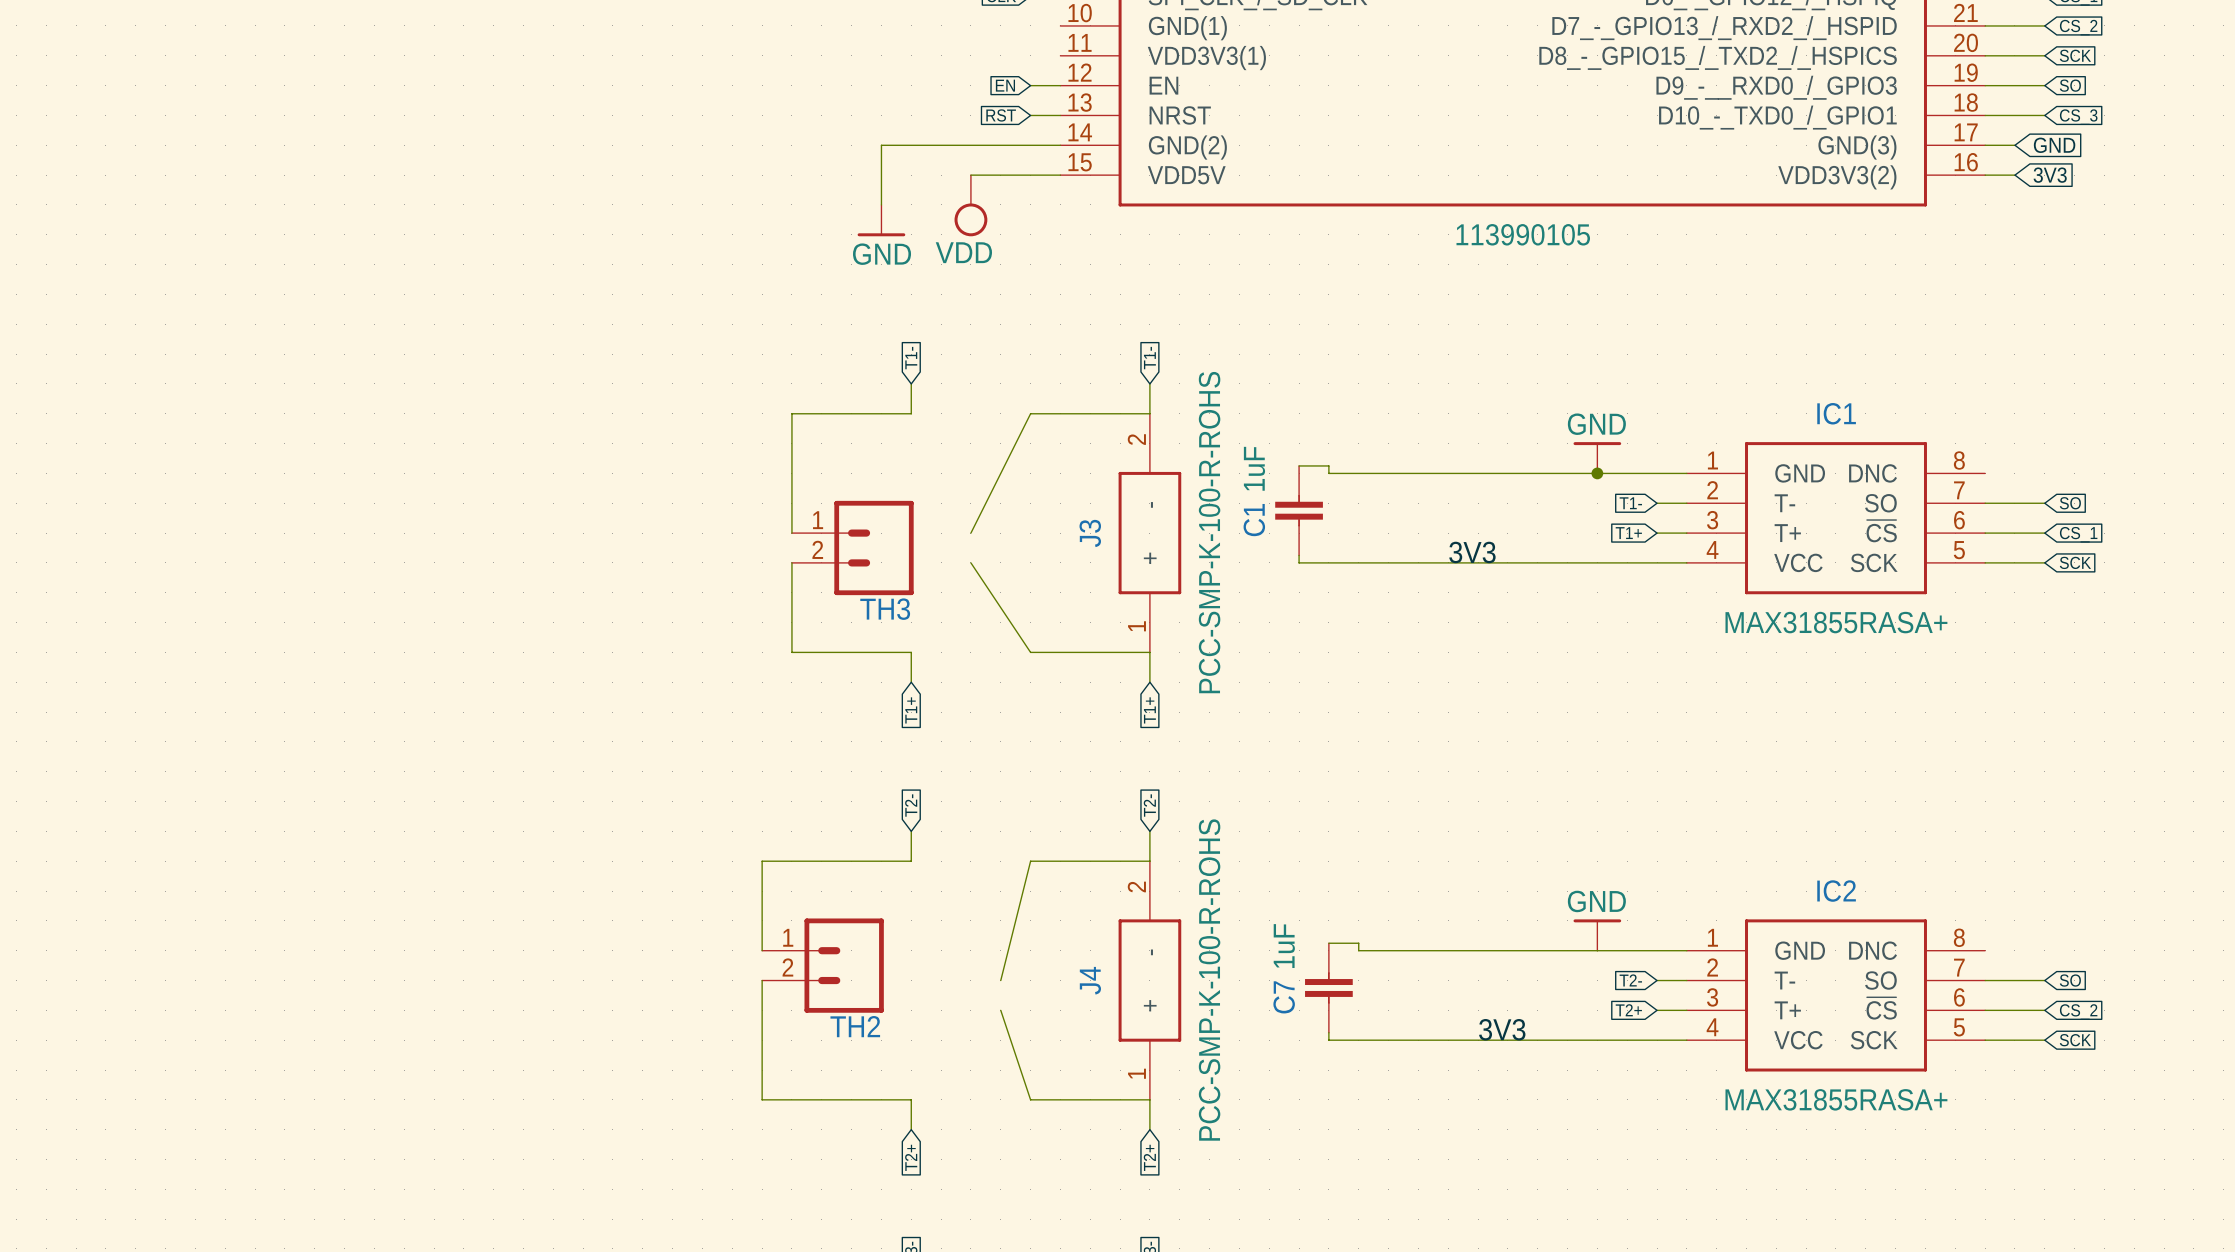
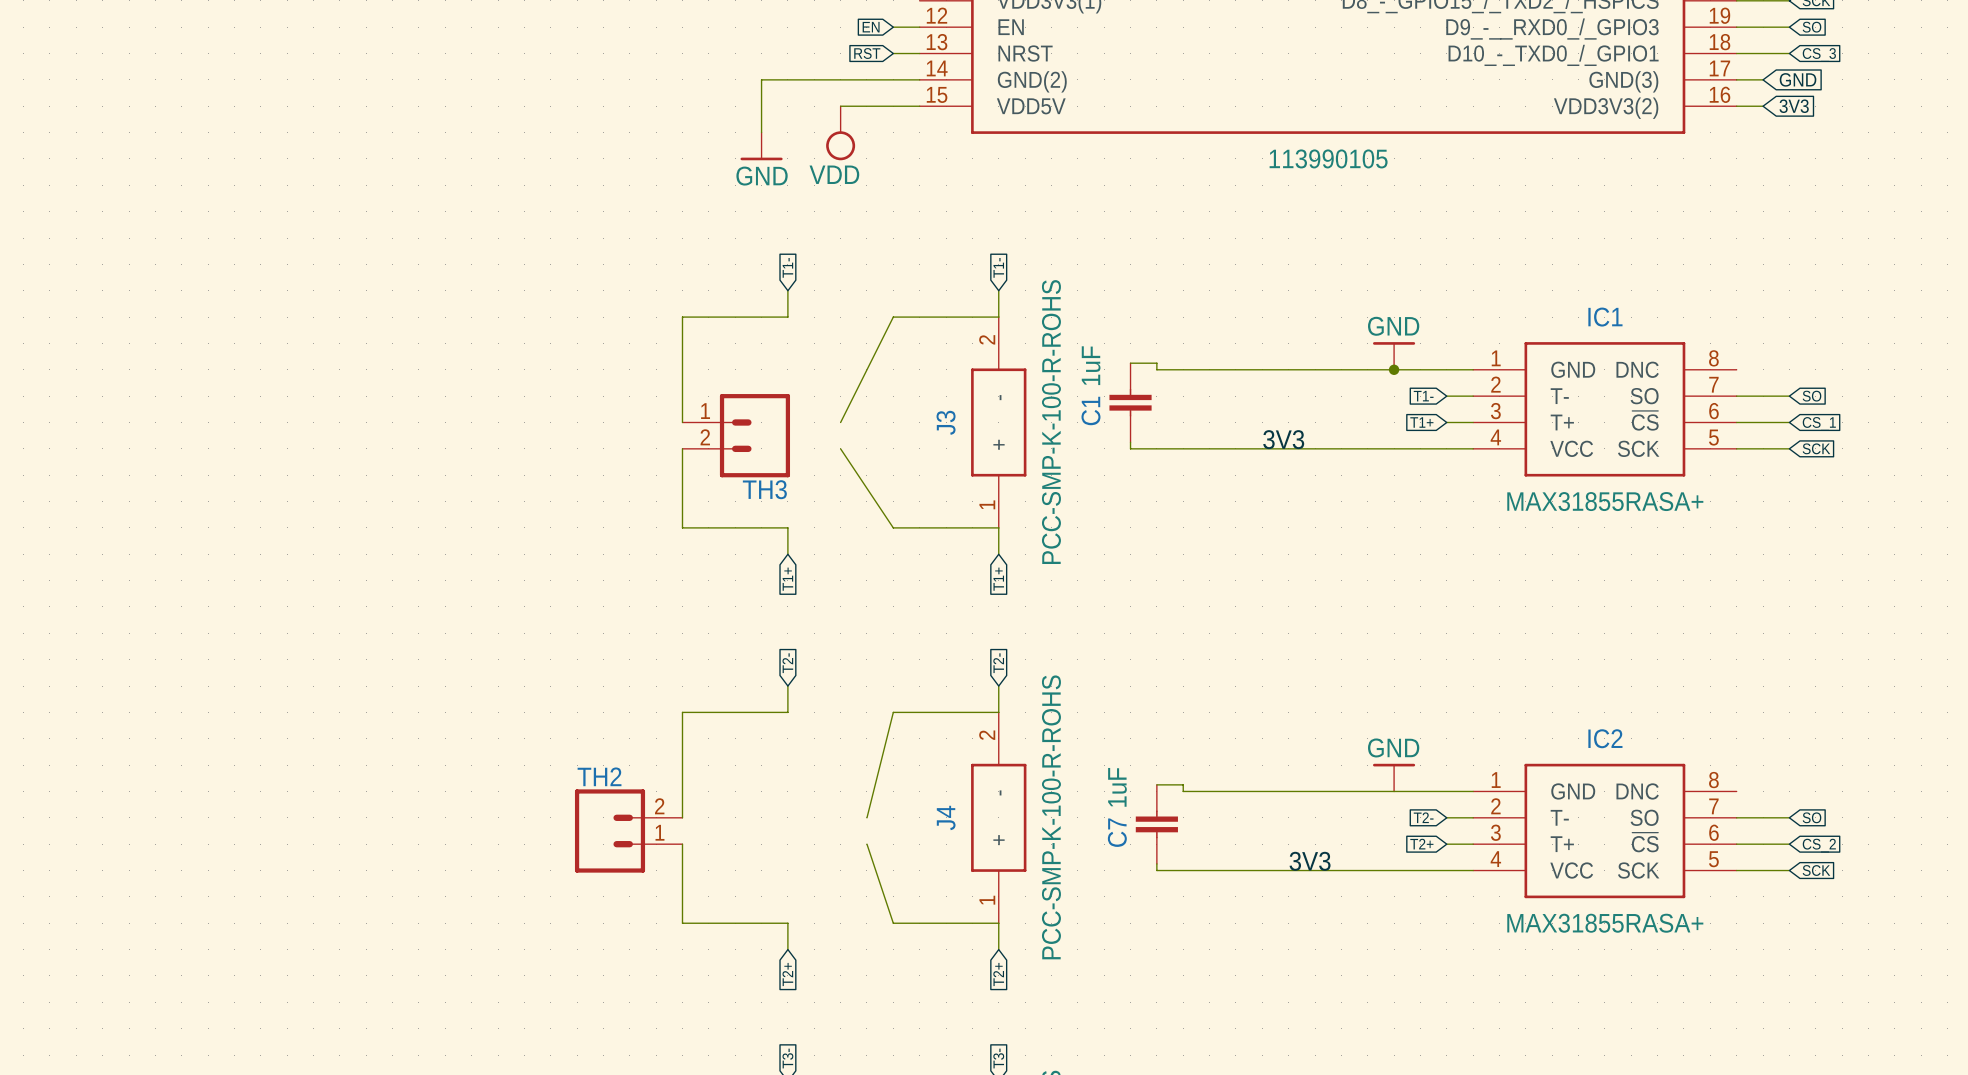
wire: (791, 861) (762, 861) (762, 950) -> (682, 712) (682, 817)
TH2 position: (822, 965) -> (628, 830)
TH2 rotation: 0° (844, 965) -> 180° (610, 830)
wire: (762, 980) (762, 1099) (791, 1099) -> (682, 844) (682, 923)

